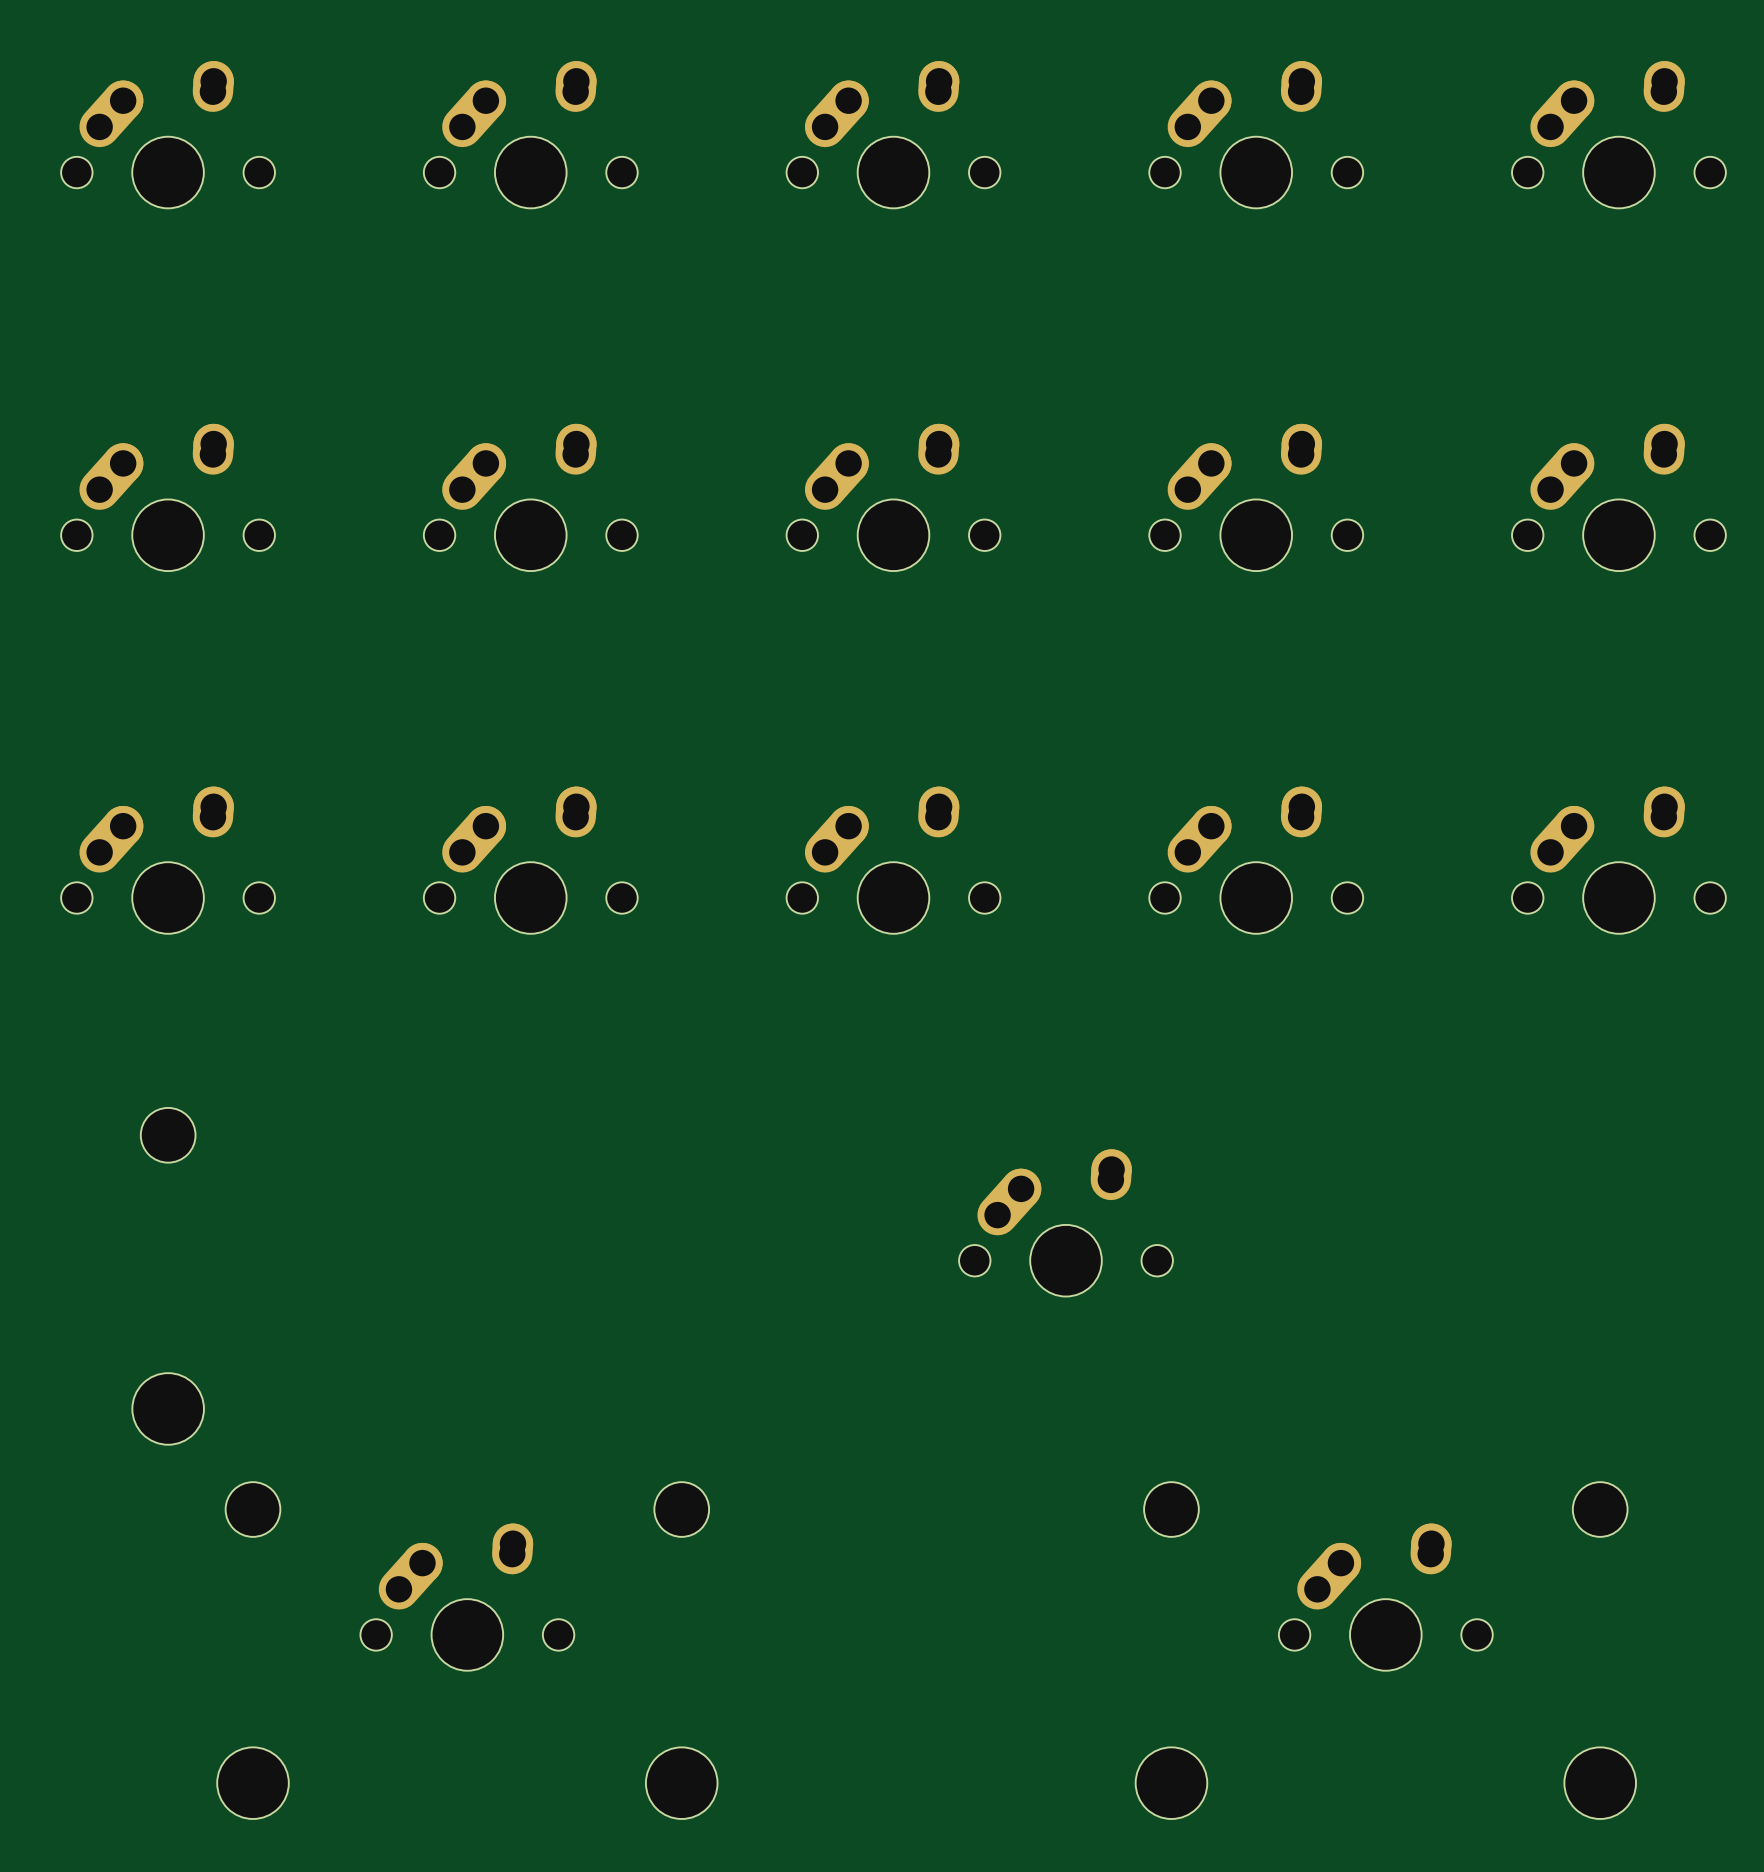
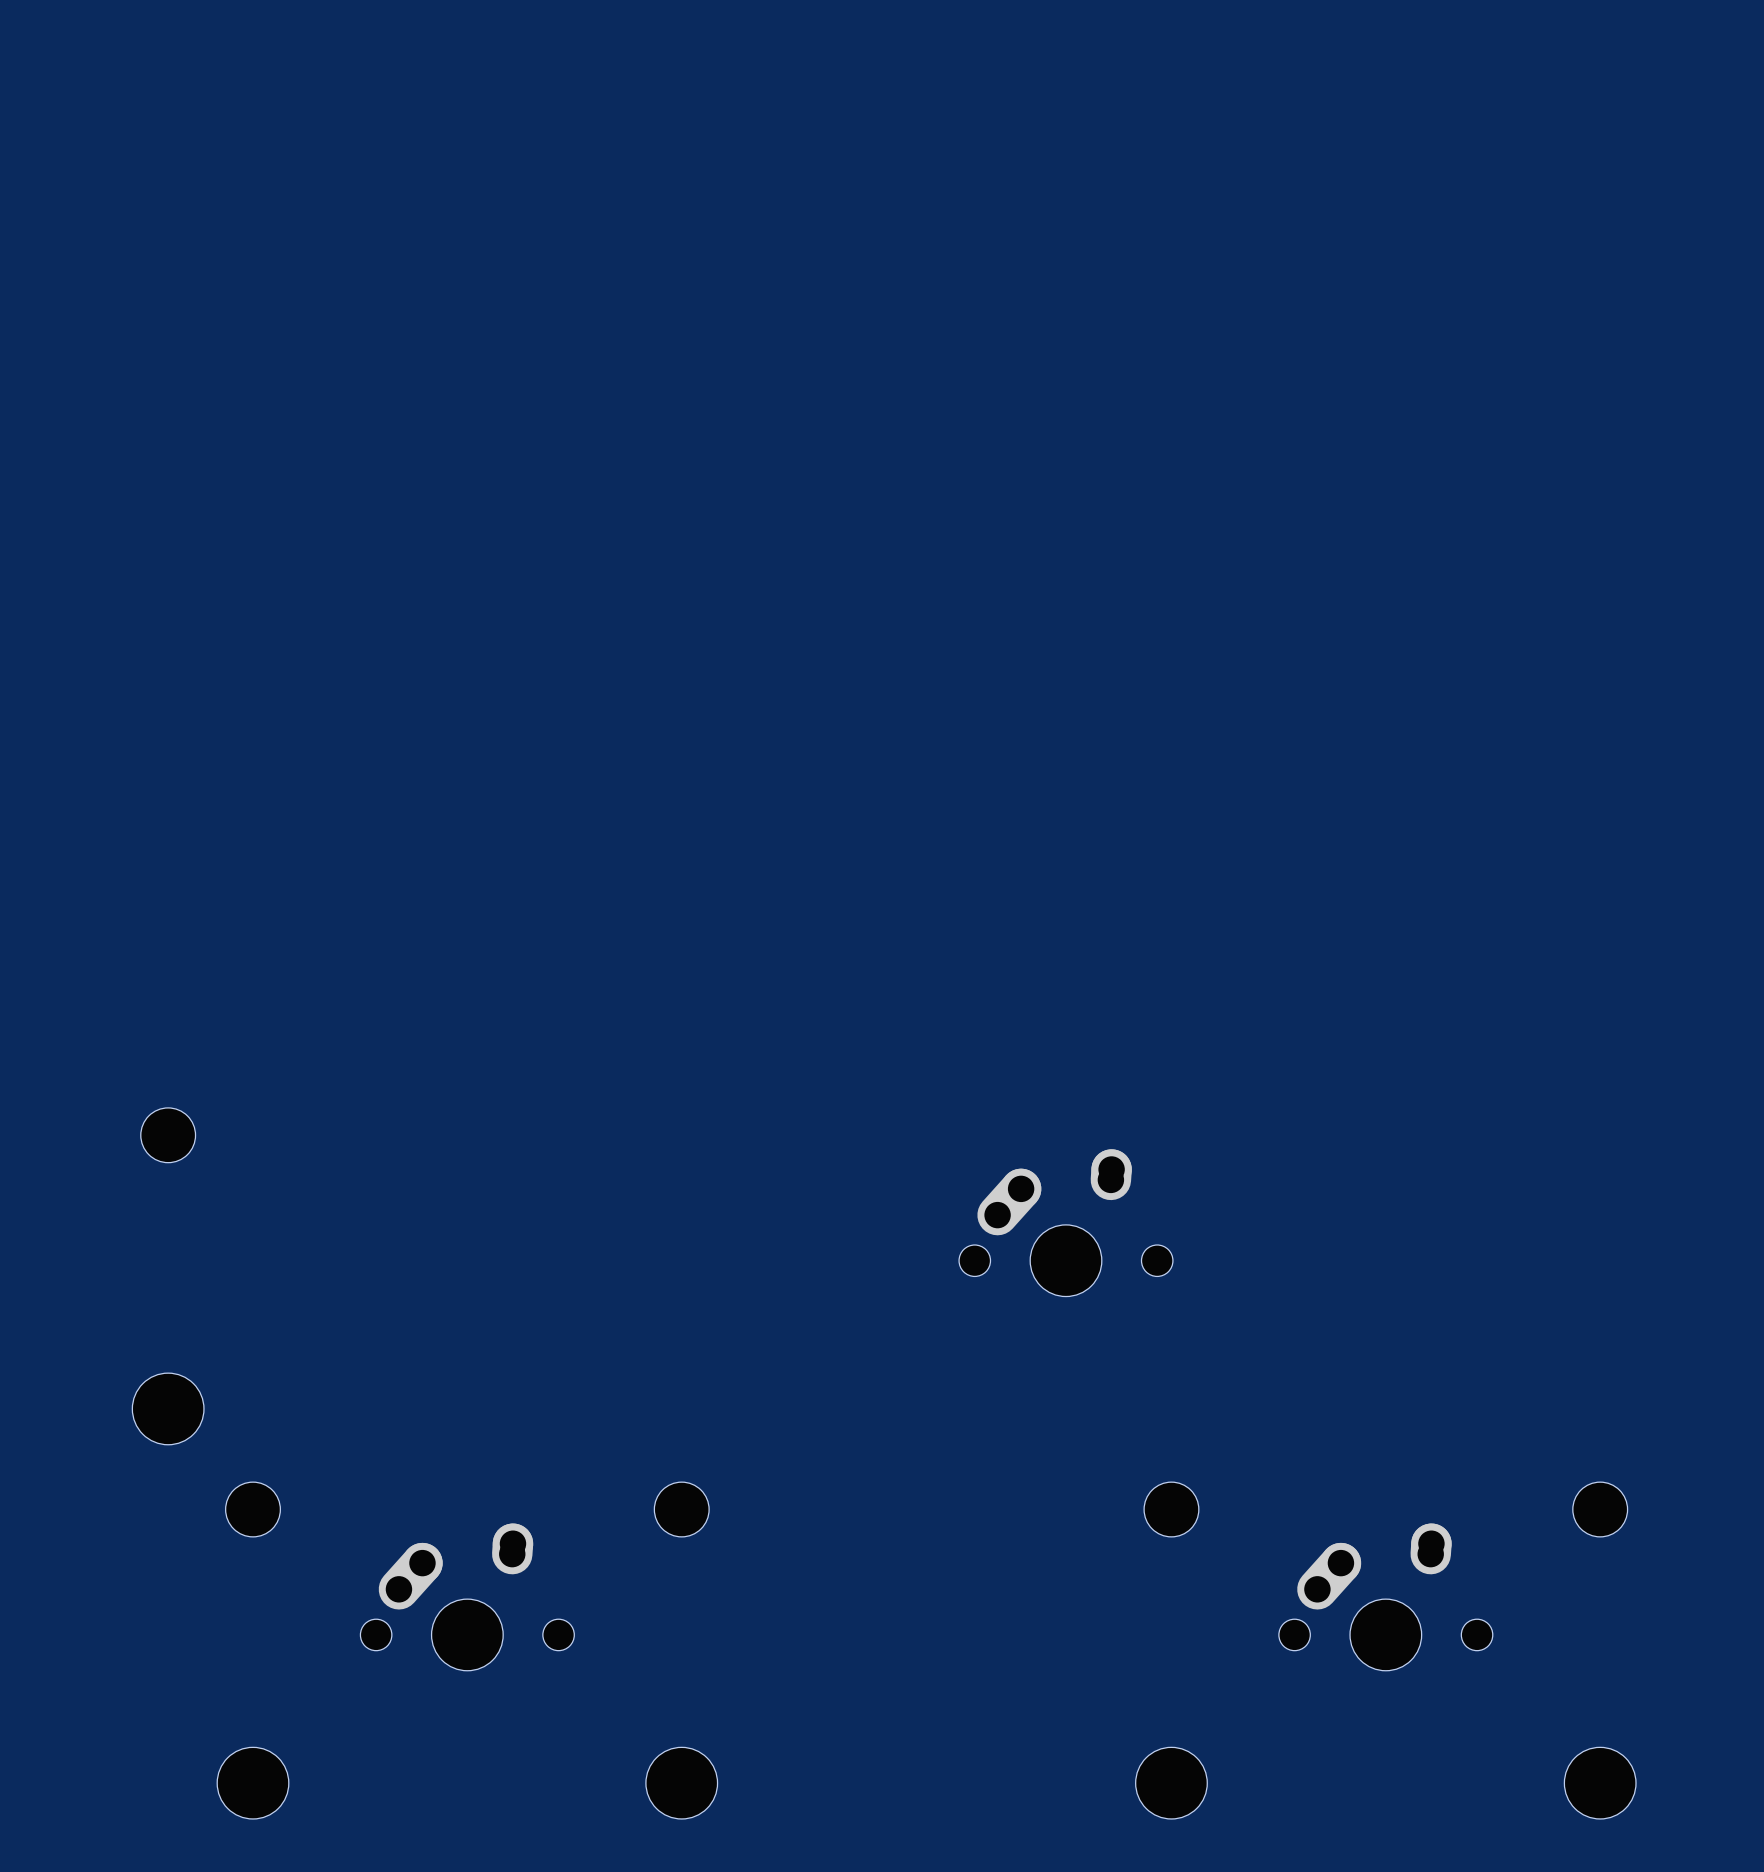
part: (168, 134) -> none
part: (530, 134) -> none
part: (893, 134) -> none
part: (1256, 134) -> none
part: (1618, 134) -> none
part: (168, 497) -> none
part: (530, 497) -> none
part: (893, 497) -> none
part: (1256, 497) -> none
part: (1618, 497) -> none
part: (168, 860) -> none
part: (530, 860) -> none
part: (893, 860) -> none
part: (1256, 860) -> none
part: (1618, 860) -> none

